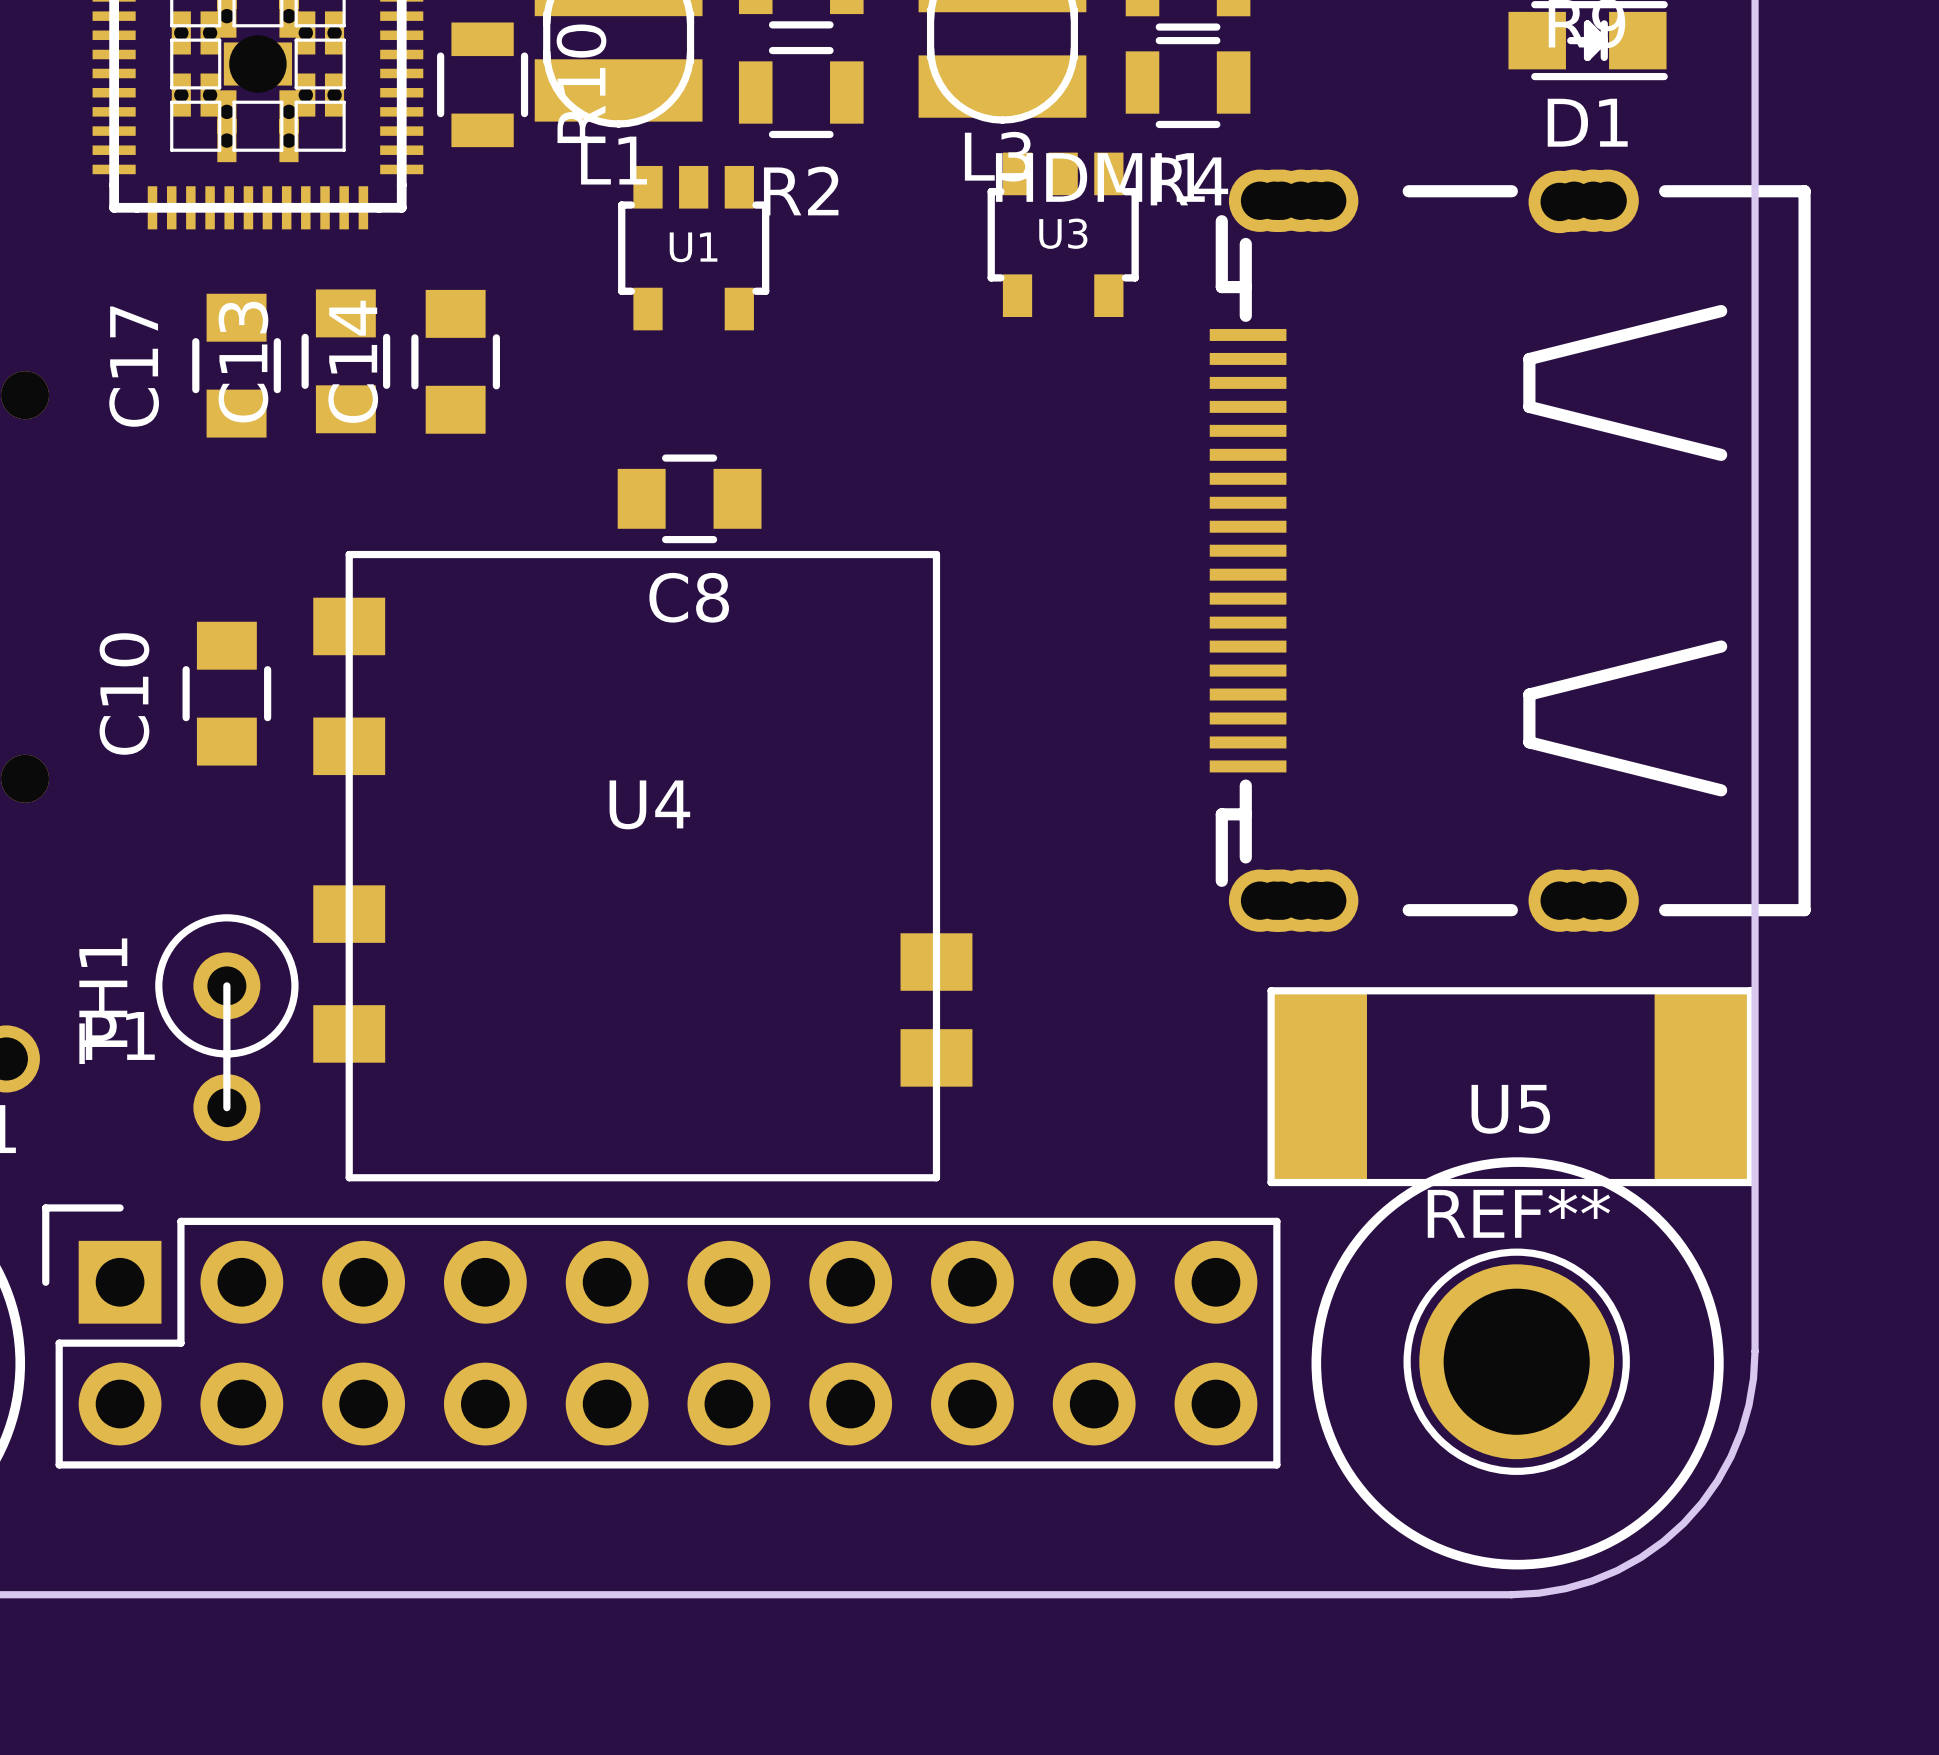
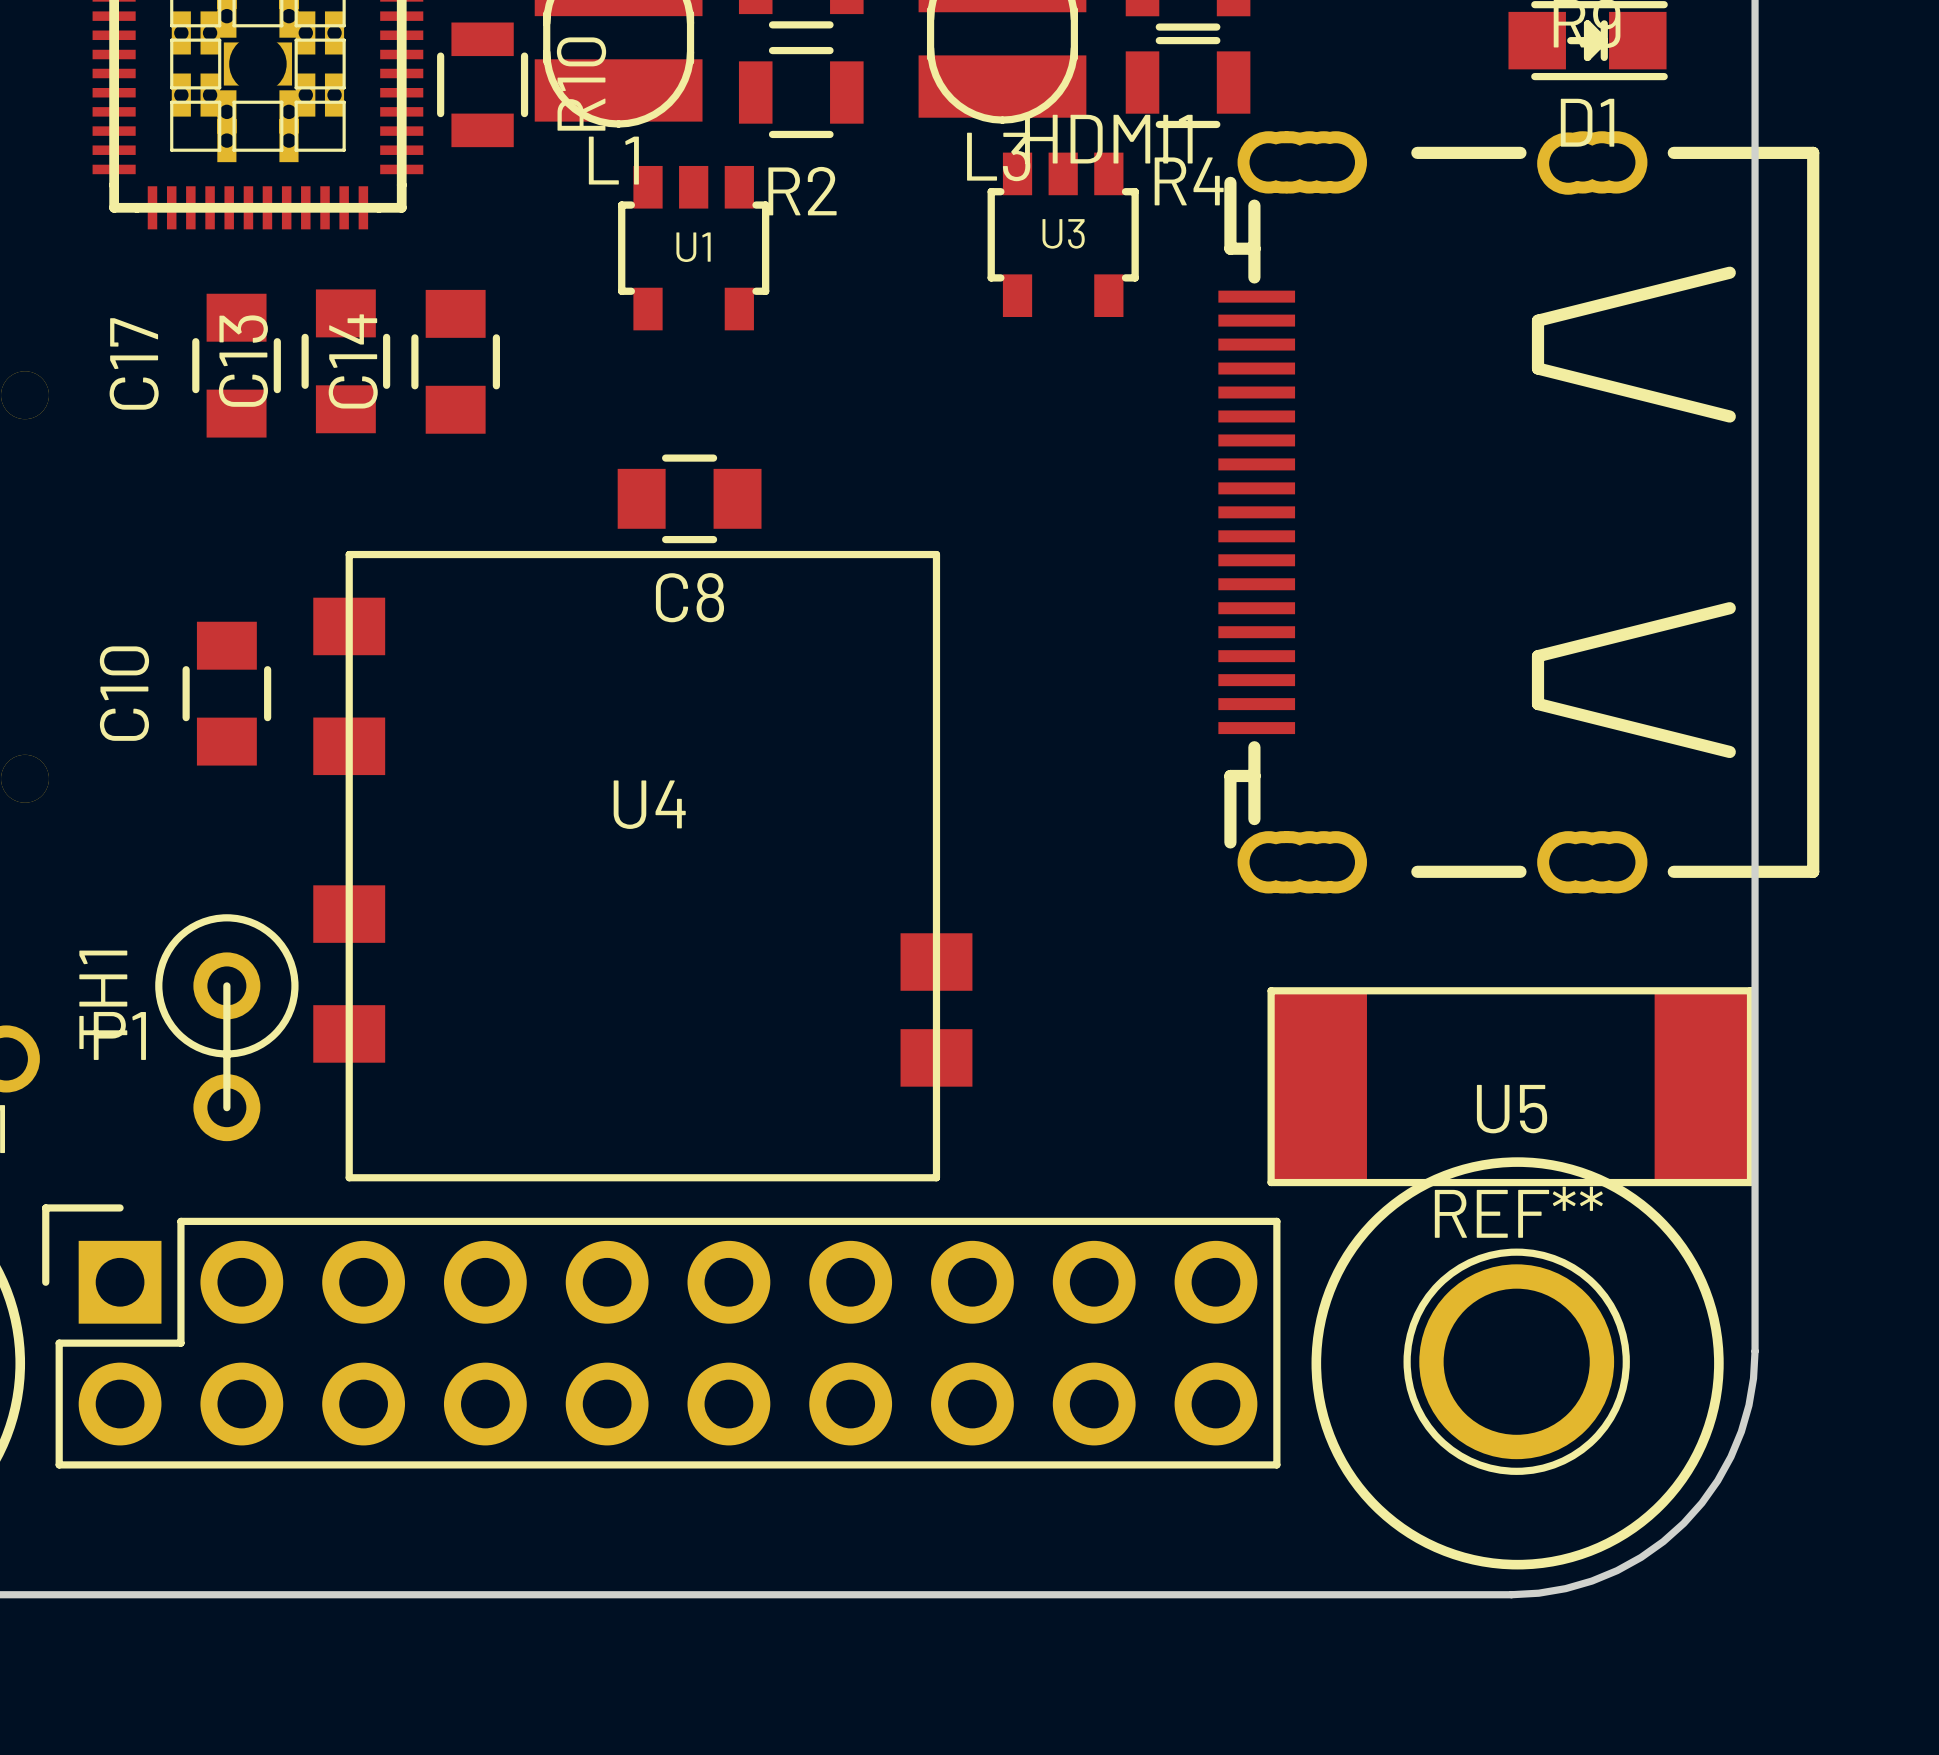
HDMI1 position: (1510, 550) -> (1518, 512)

